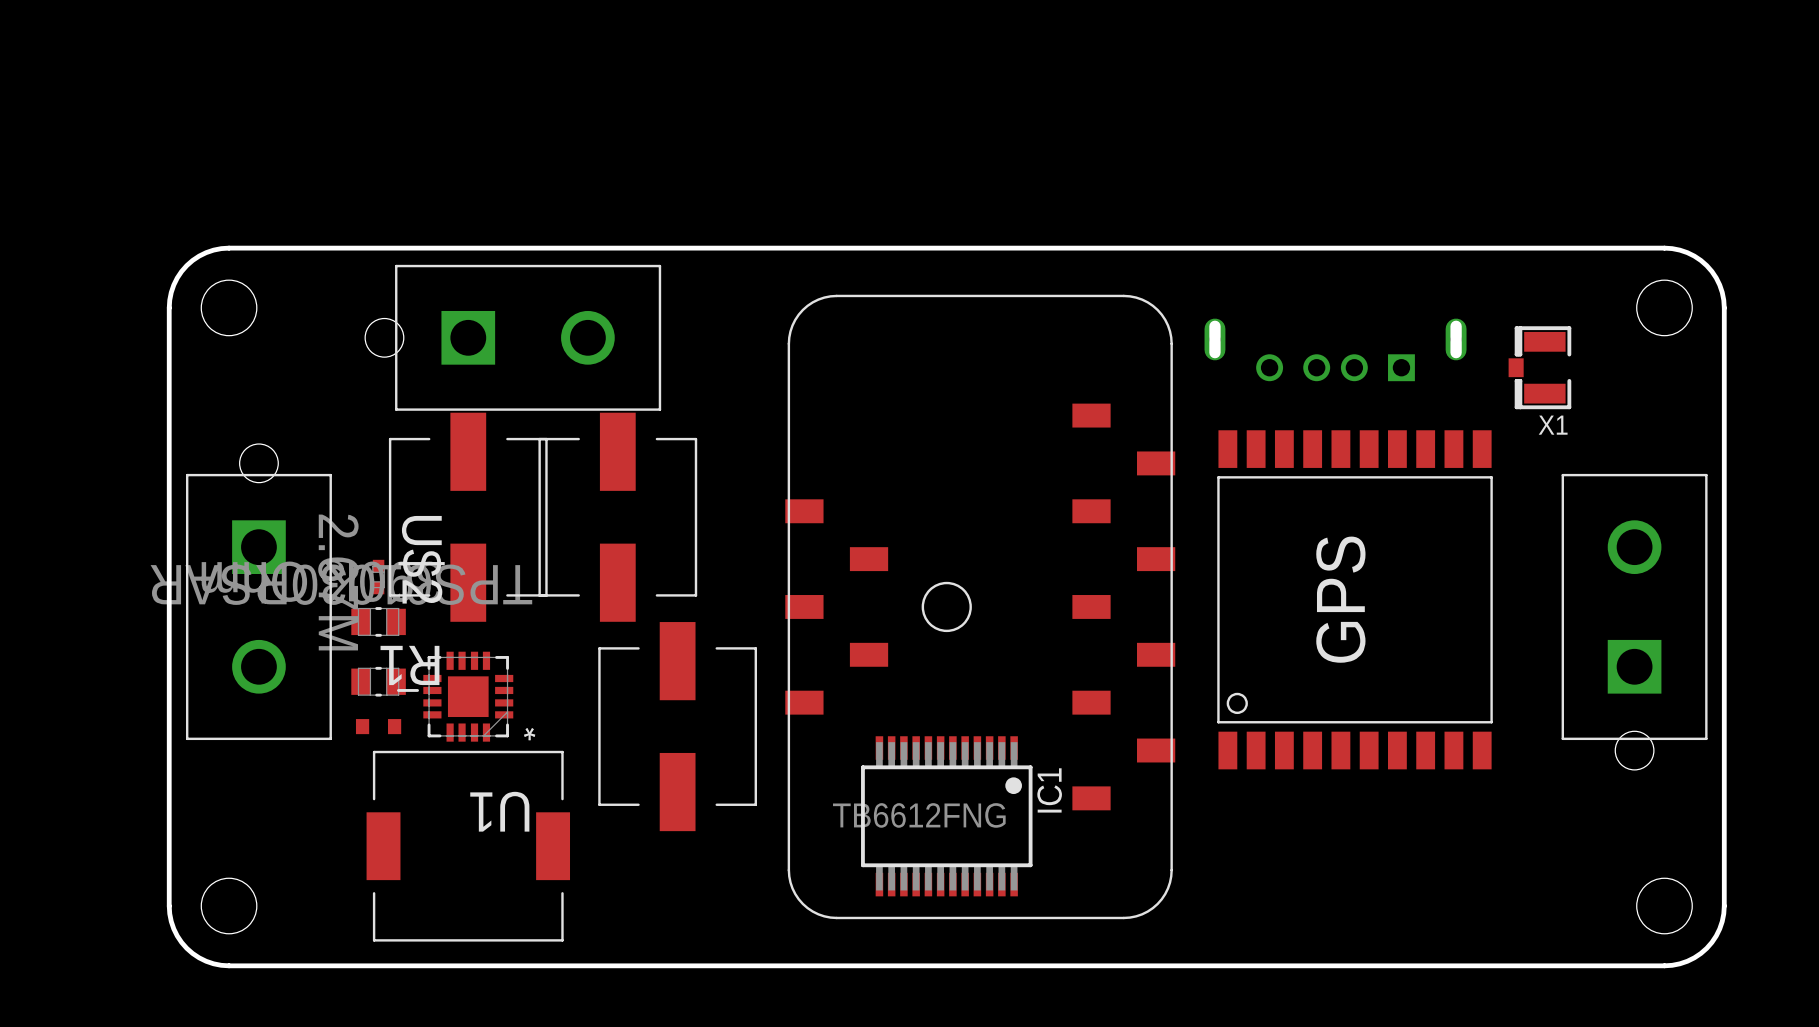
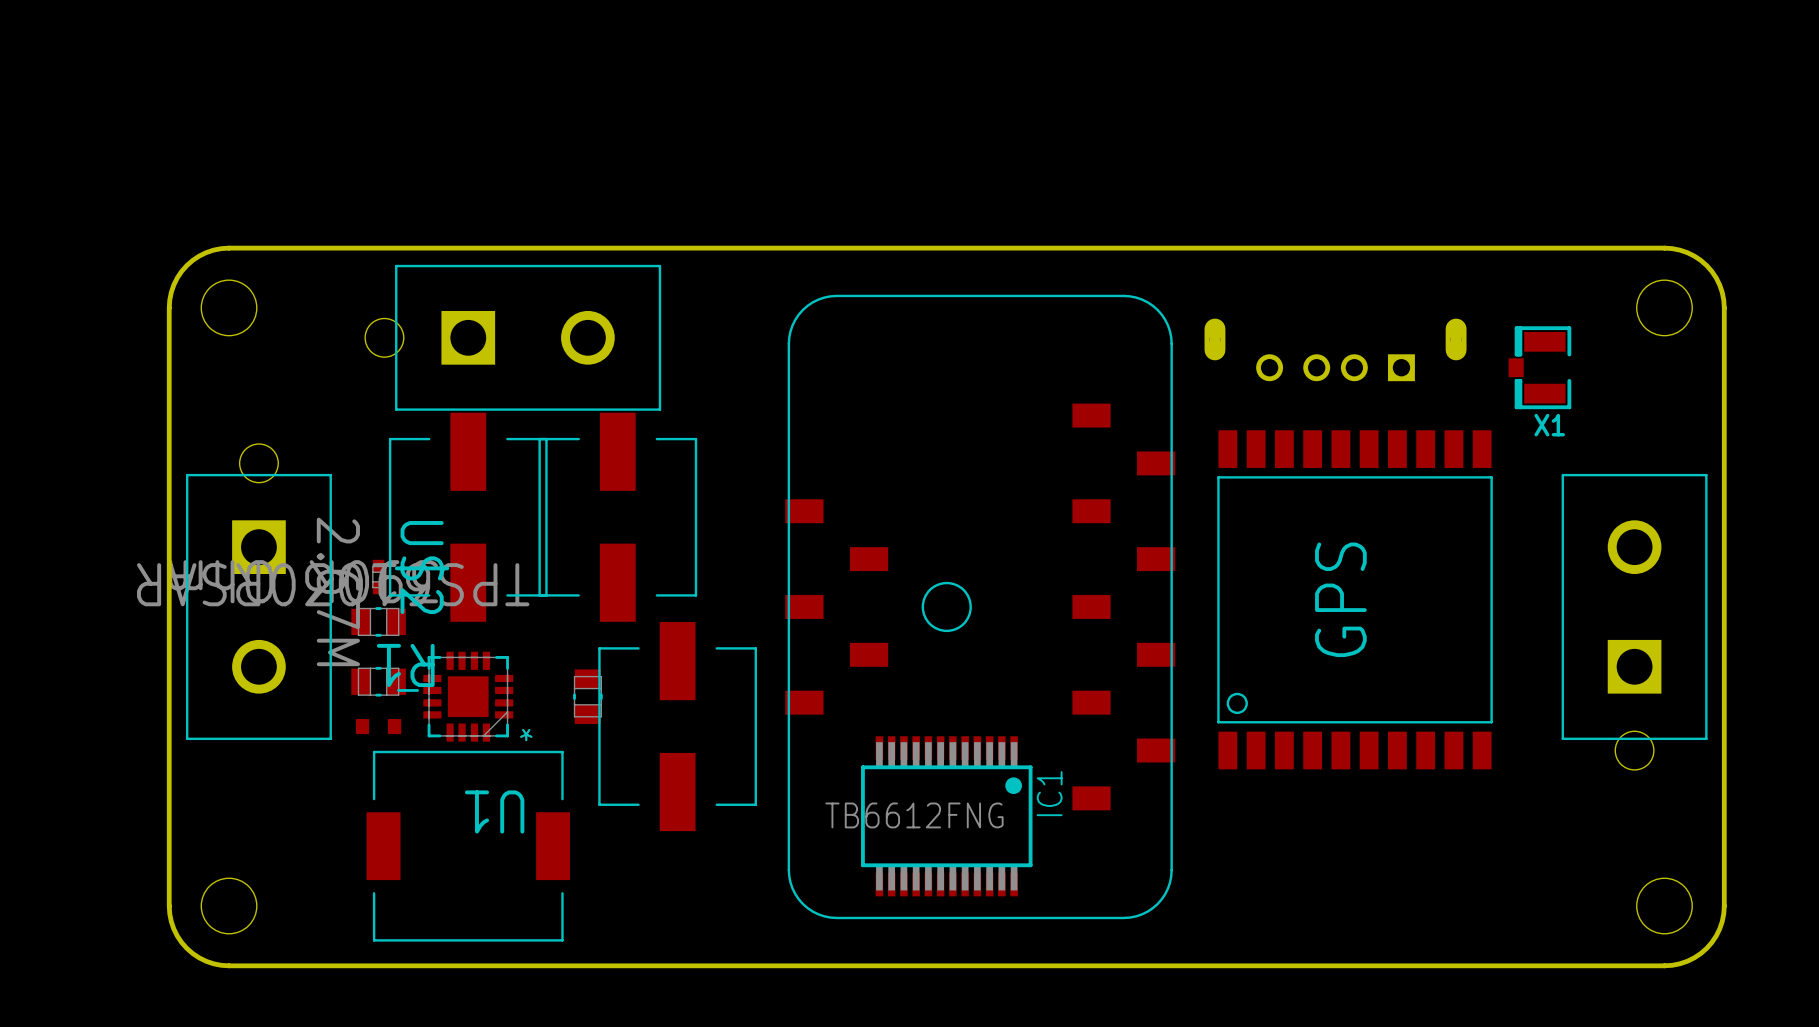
part: none -> (587, 696)

